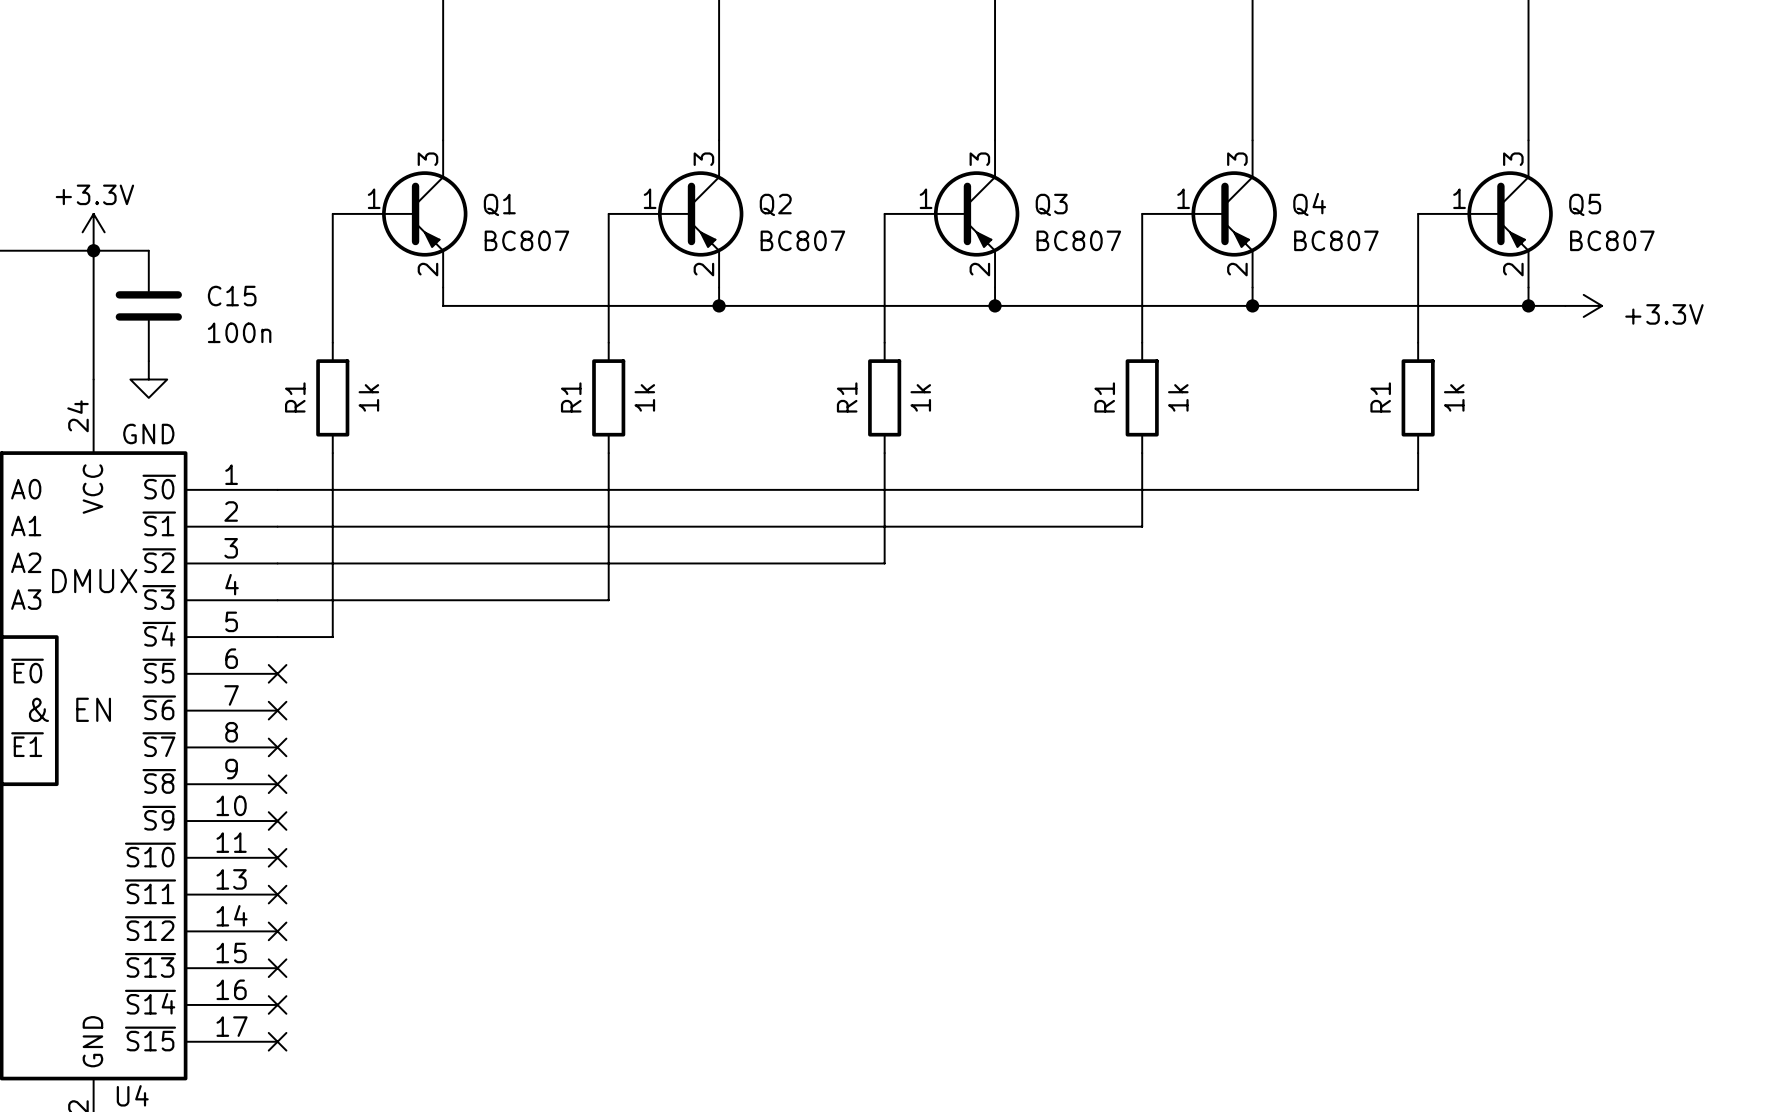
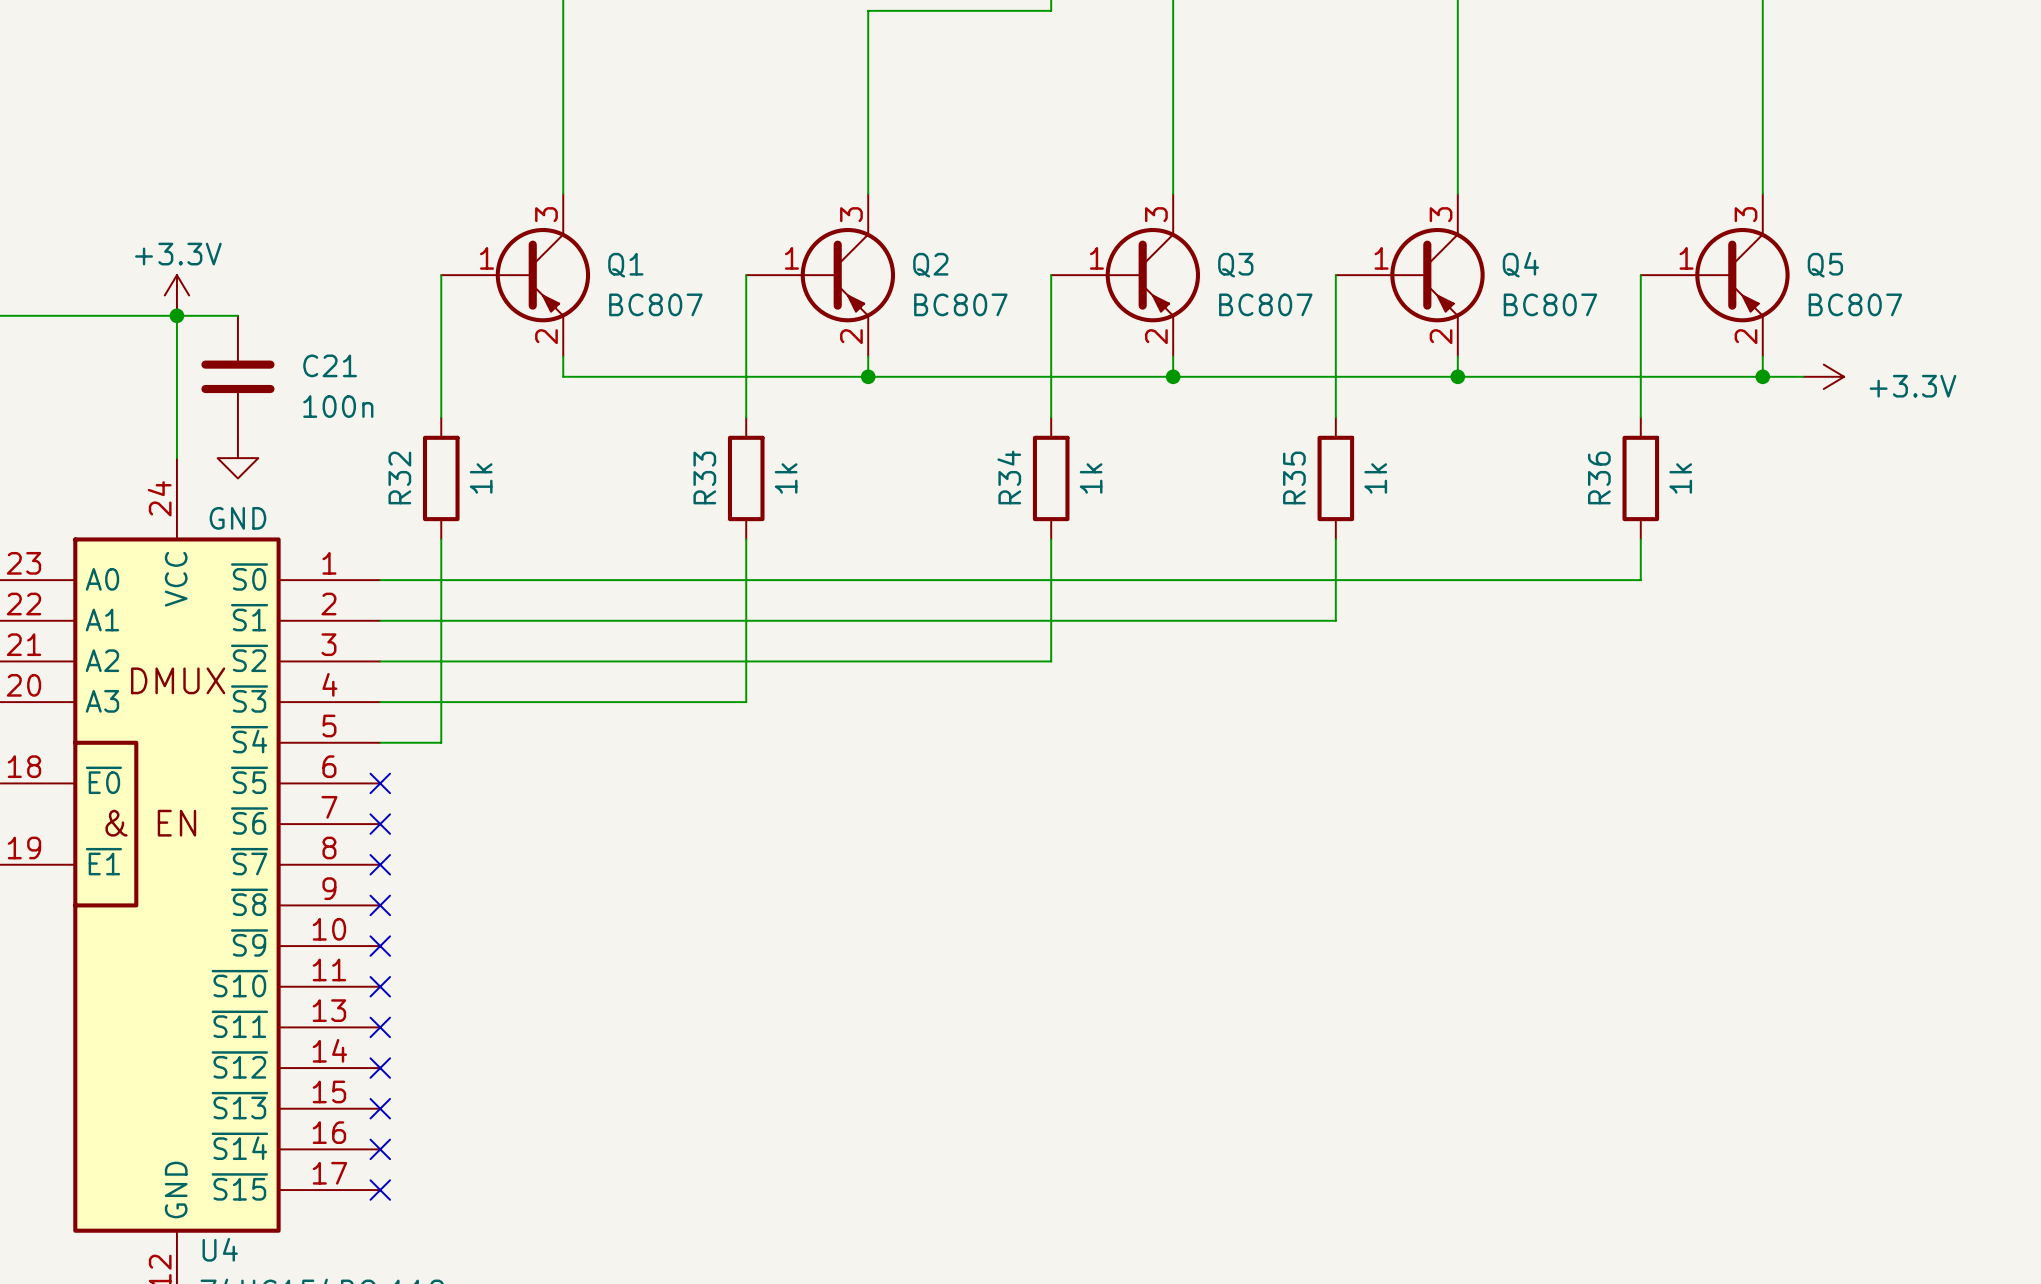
C15 name: C15 (232, 296) -> C21 (330, 365)
R1 name: R1 (295, 397) -> R32 (399, 477)
R1 name: R1 (571, 397) -> R33 (704, 477)
R1 name: R1 (847, 397) -> R34 (1009, 477)
R1 name: R1 (1104, 397) -> R35 (1294, 477)
R1 name: R1 (1380, 397) -> R36 (1599, 477)

